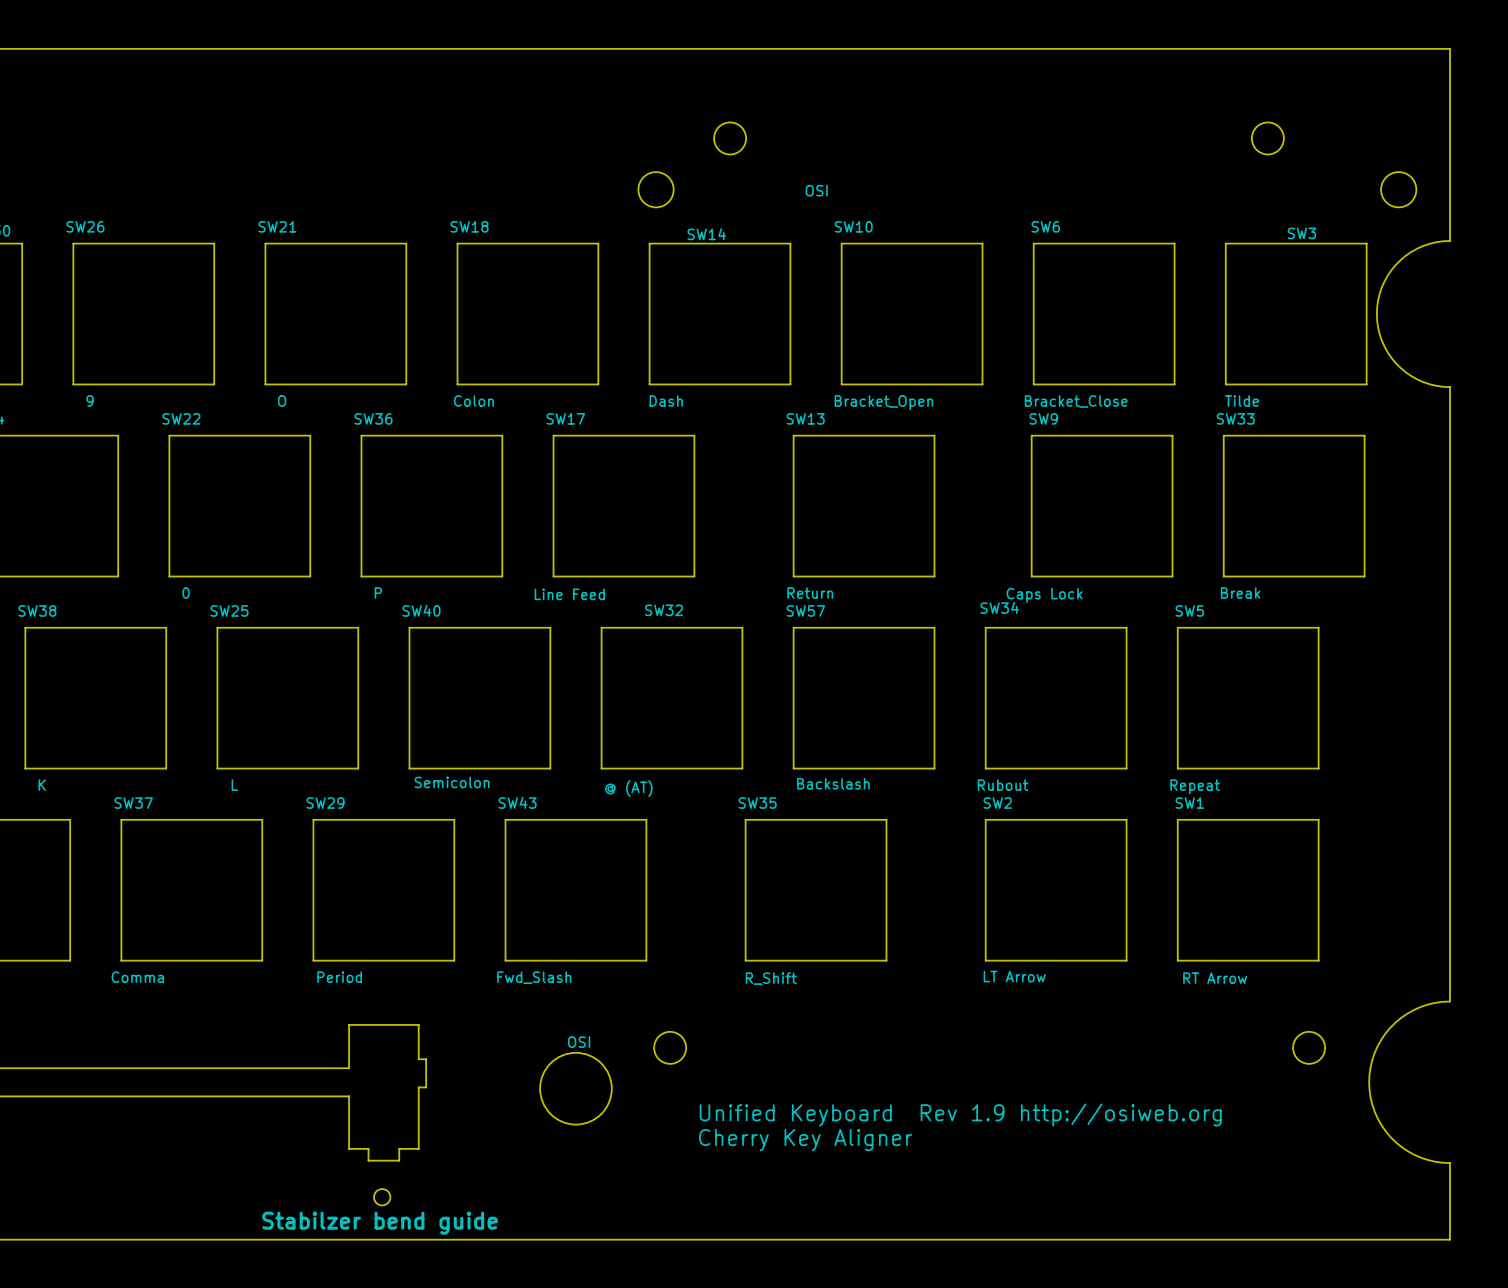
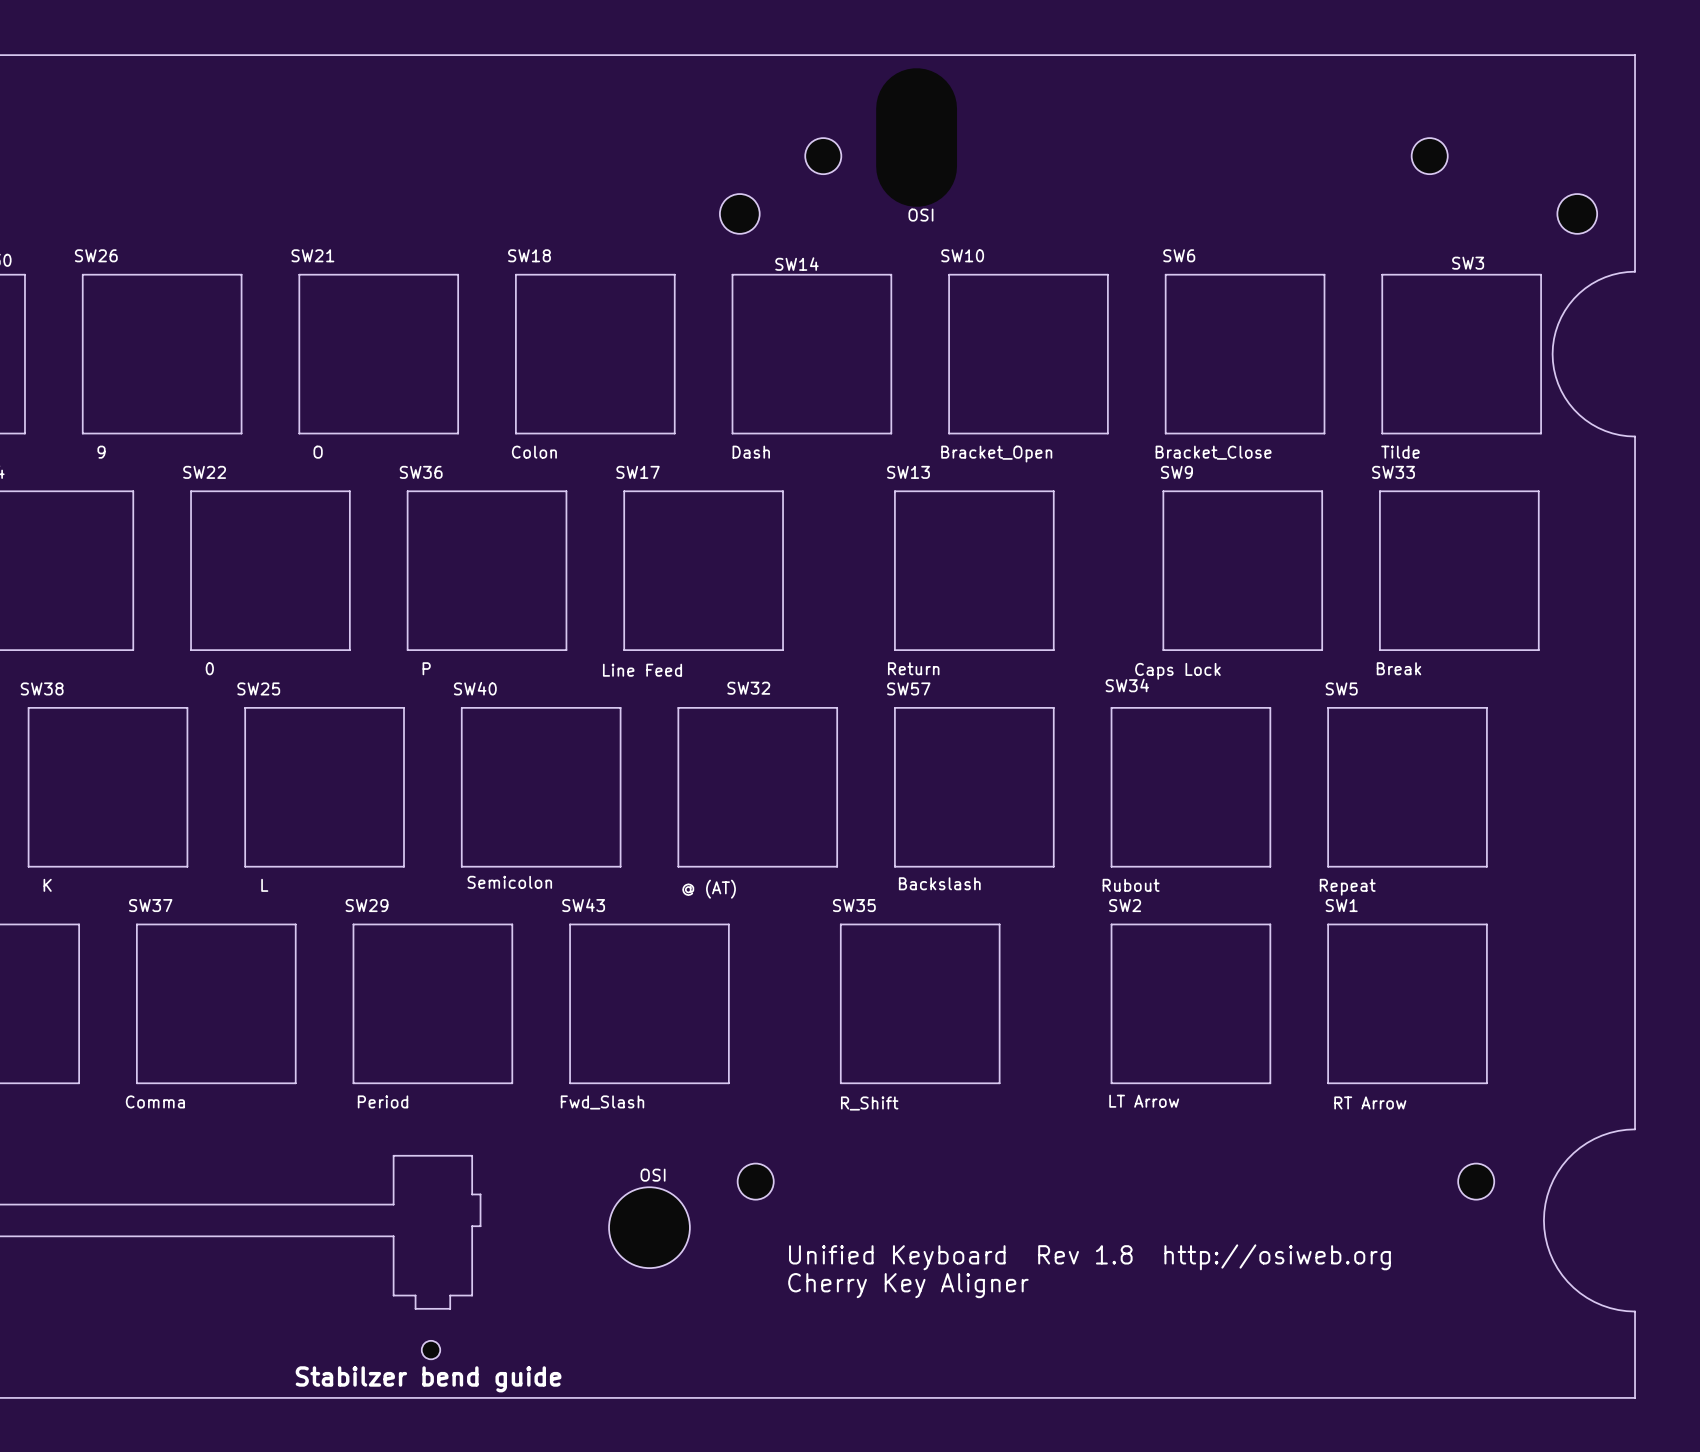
text: Unified Keyboard Rev 1.9 http://osiweb.org (960, 1114) -> Unified Keyboard Rev 1.8 http://osiweb.org (1089, 1257)

